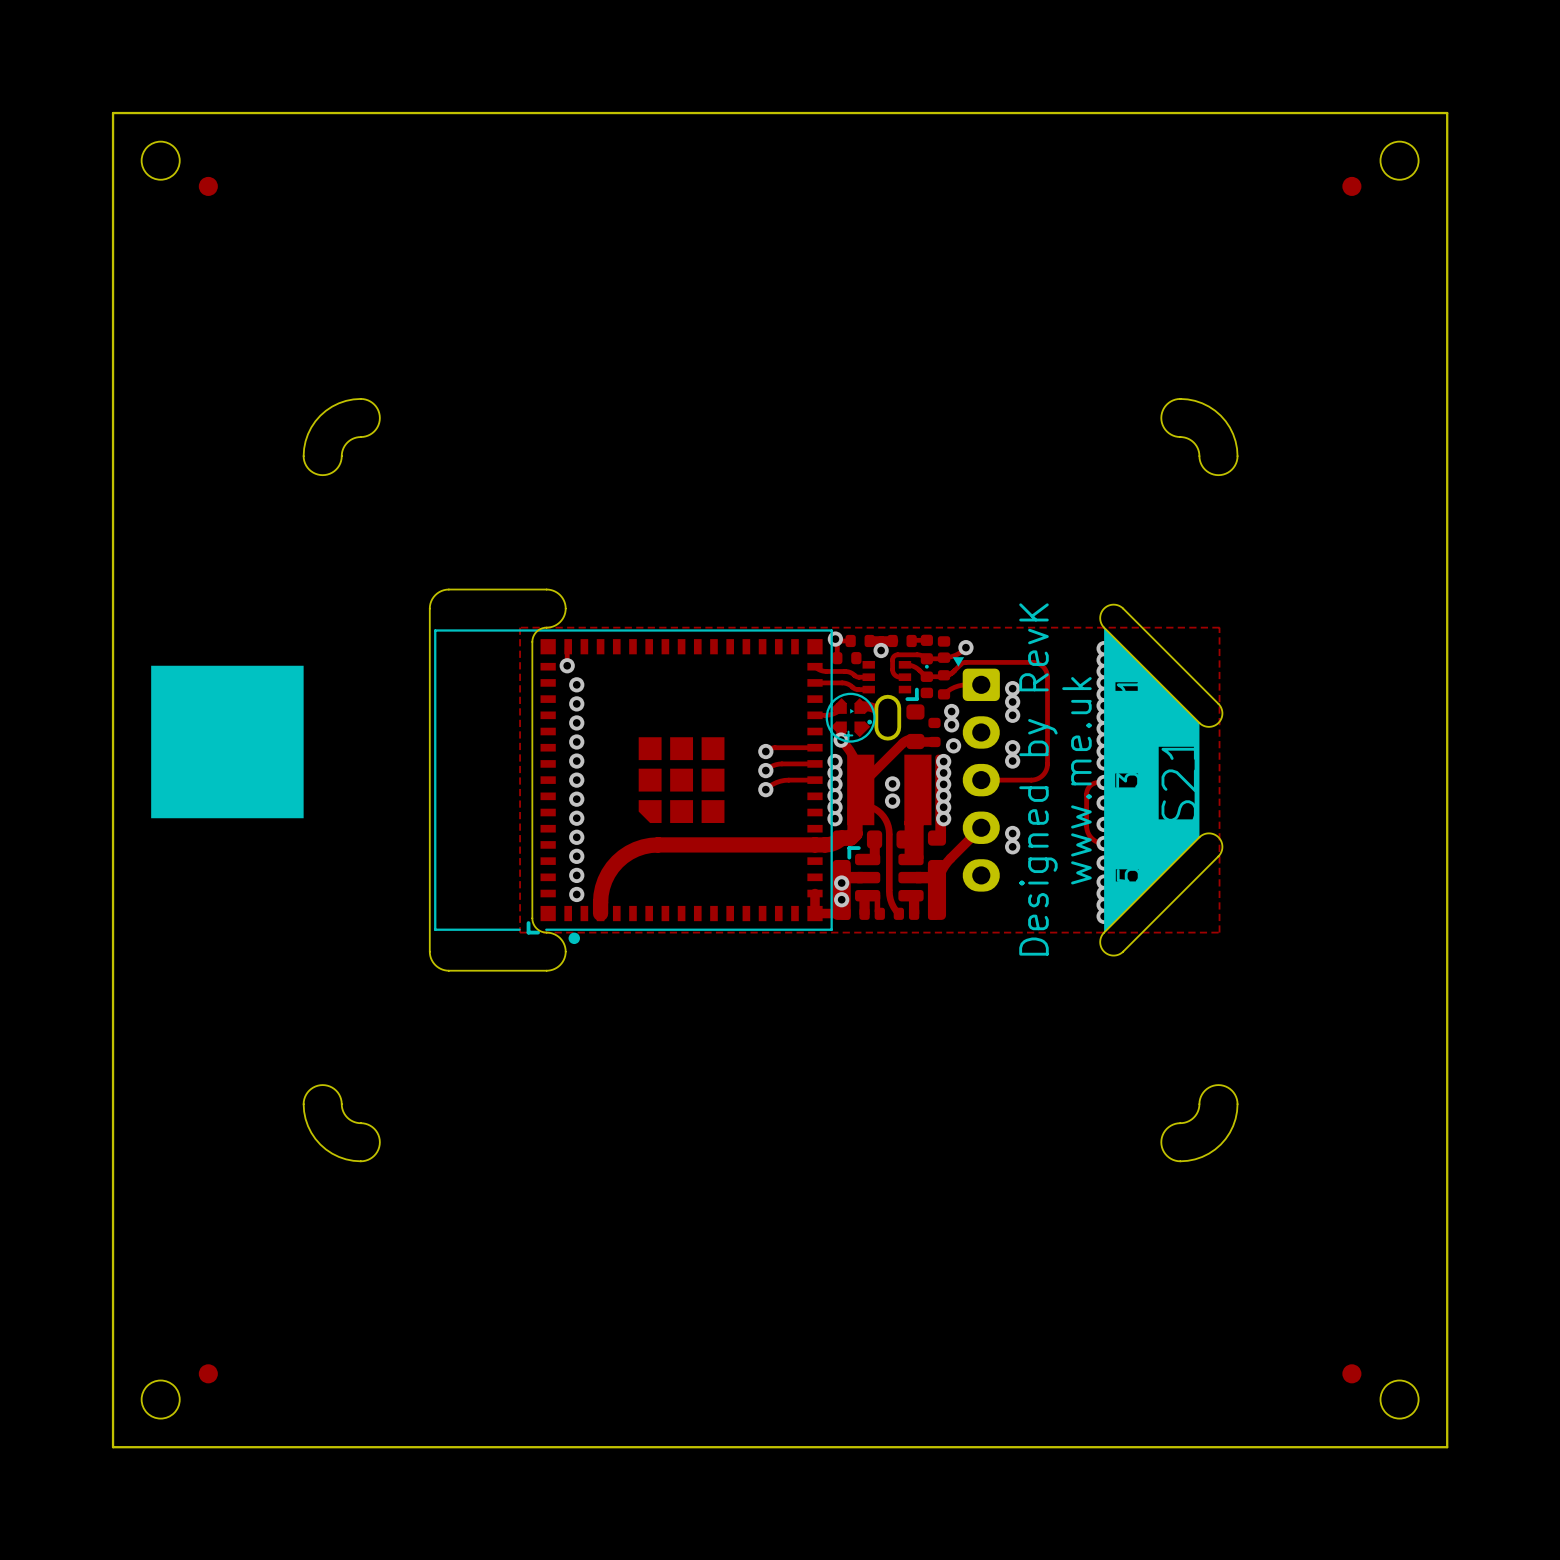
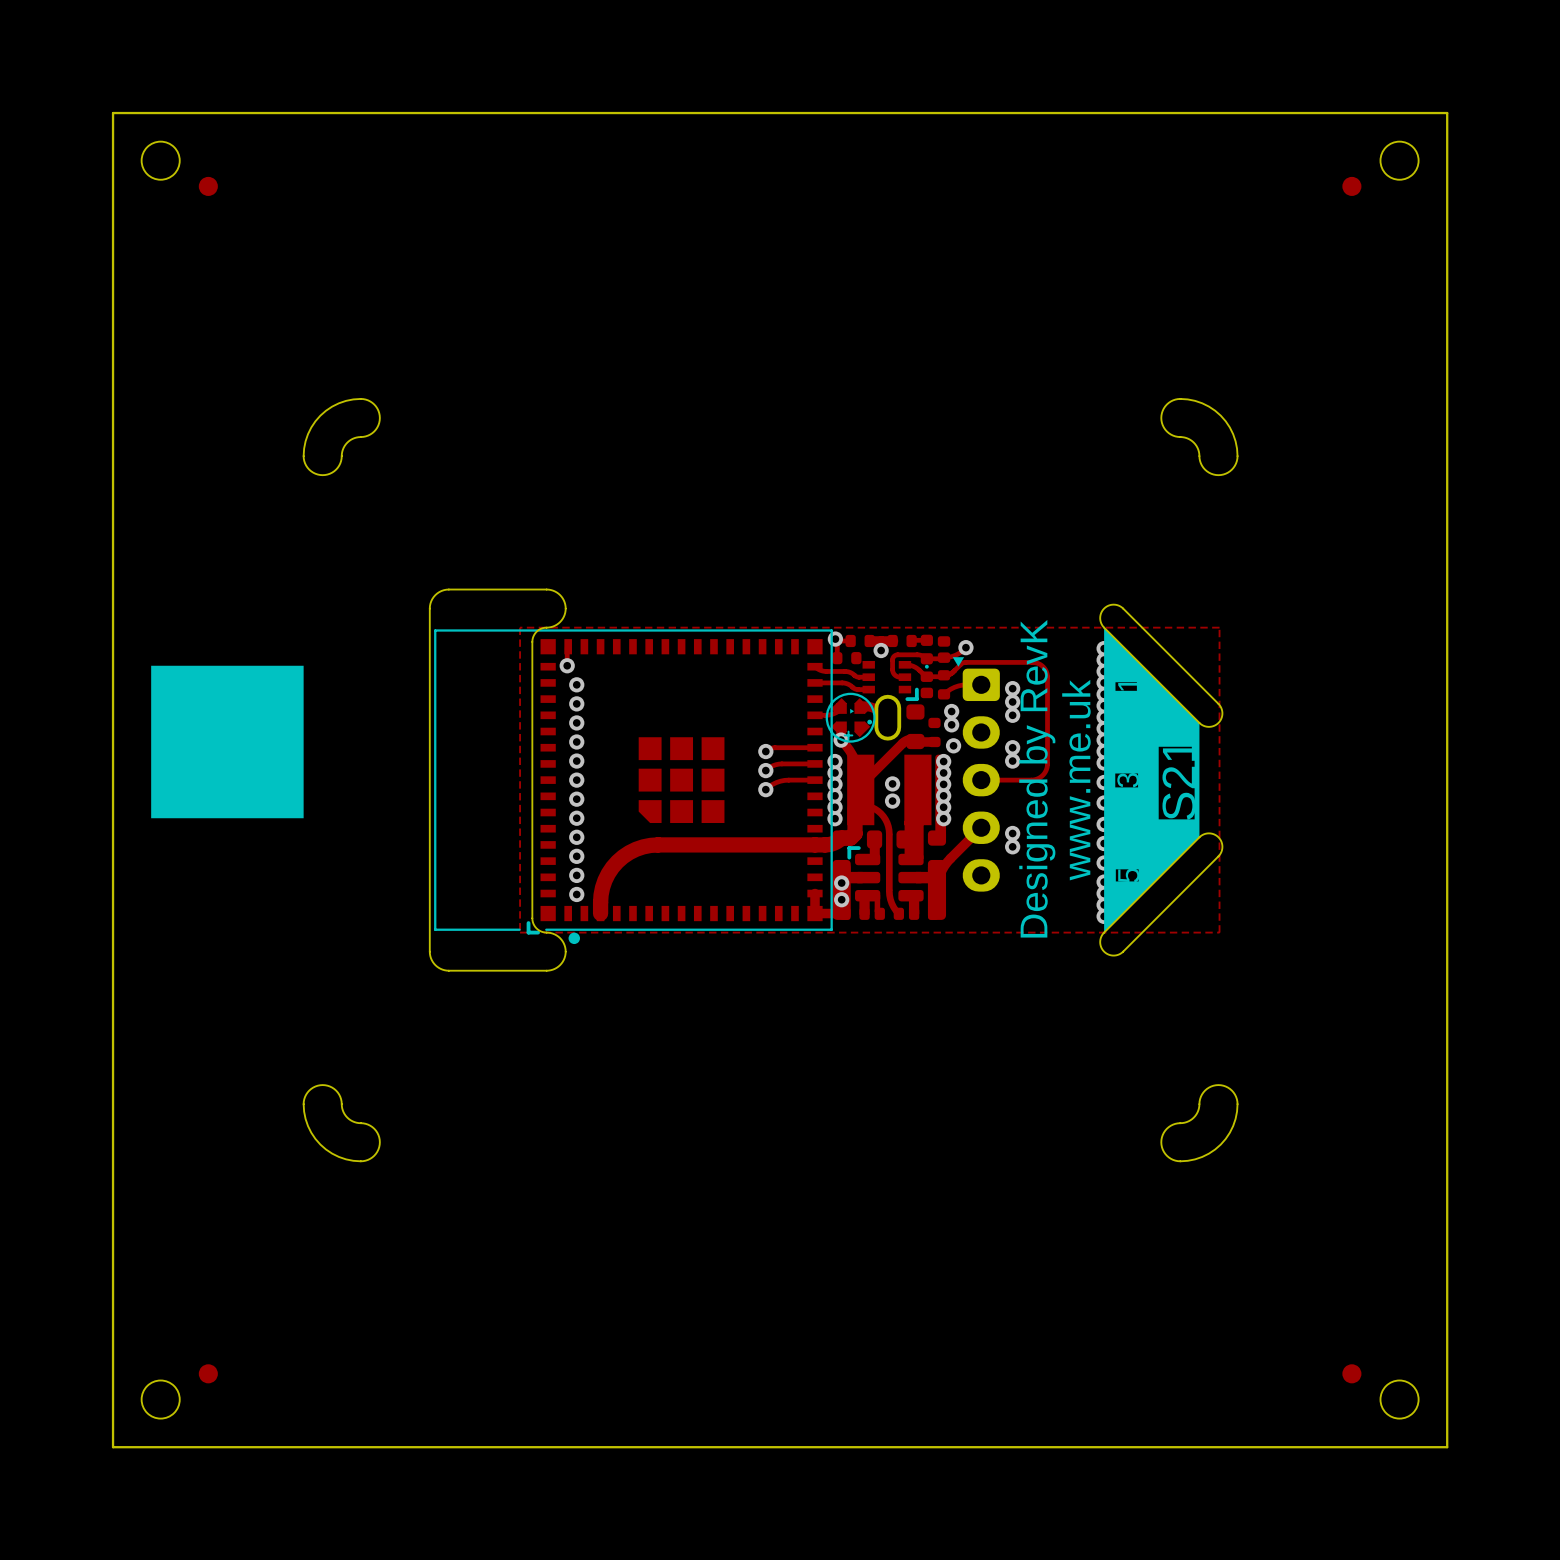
track: (1104, 782) (1093, 783) (1087, 790) (1086, 825) (1091, 838) (1104, 843) -> none

